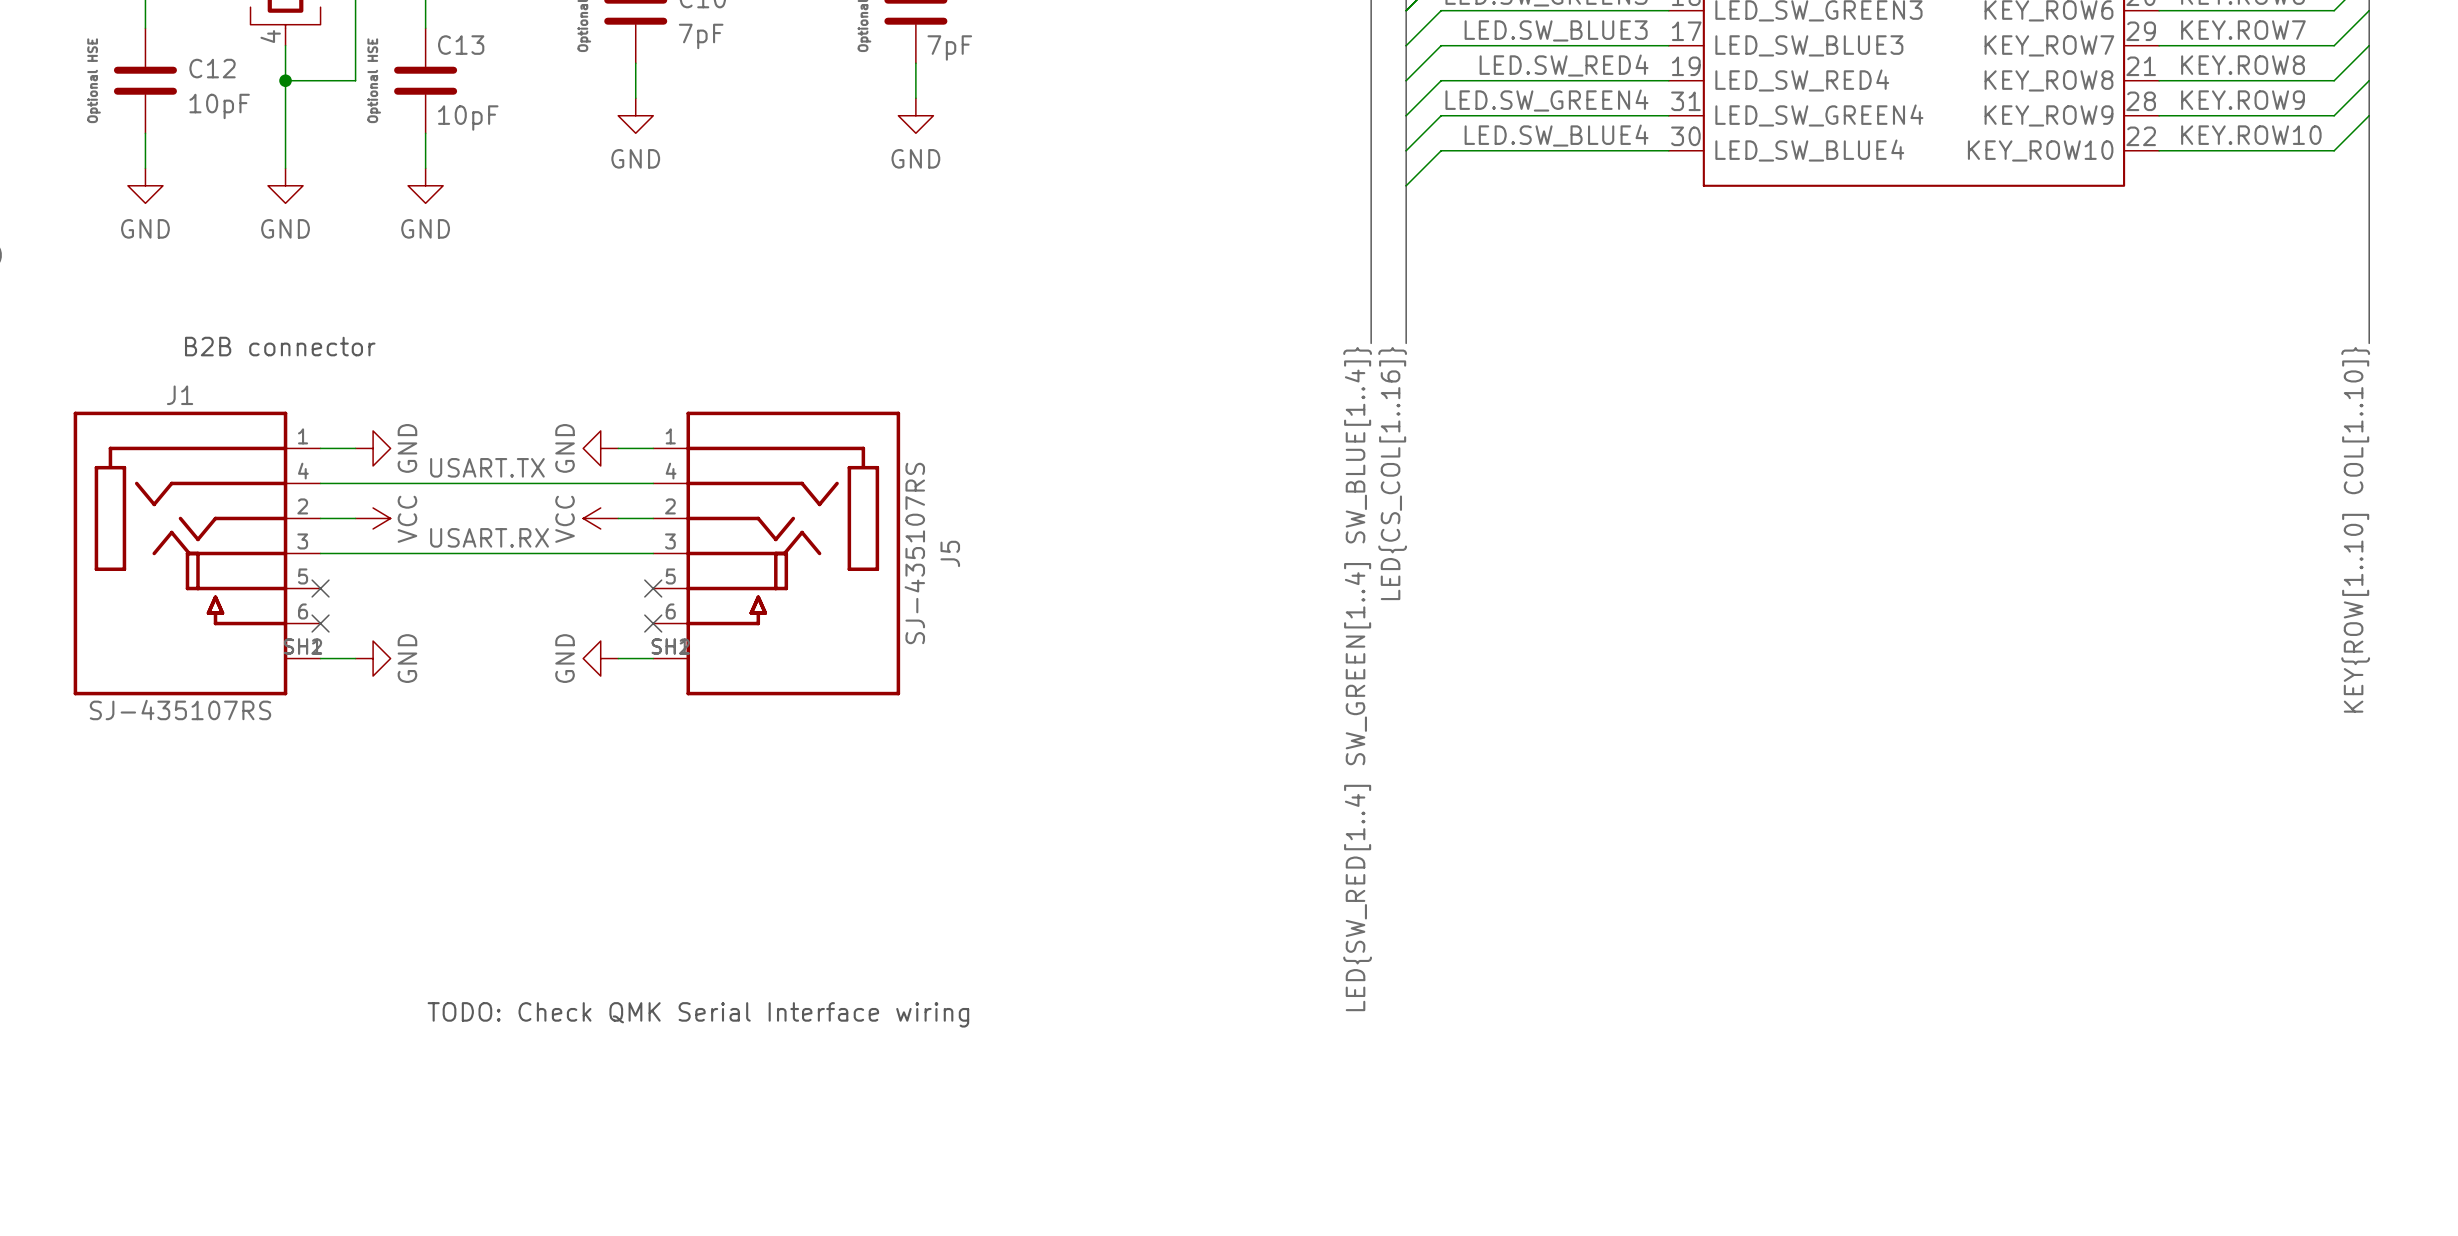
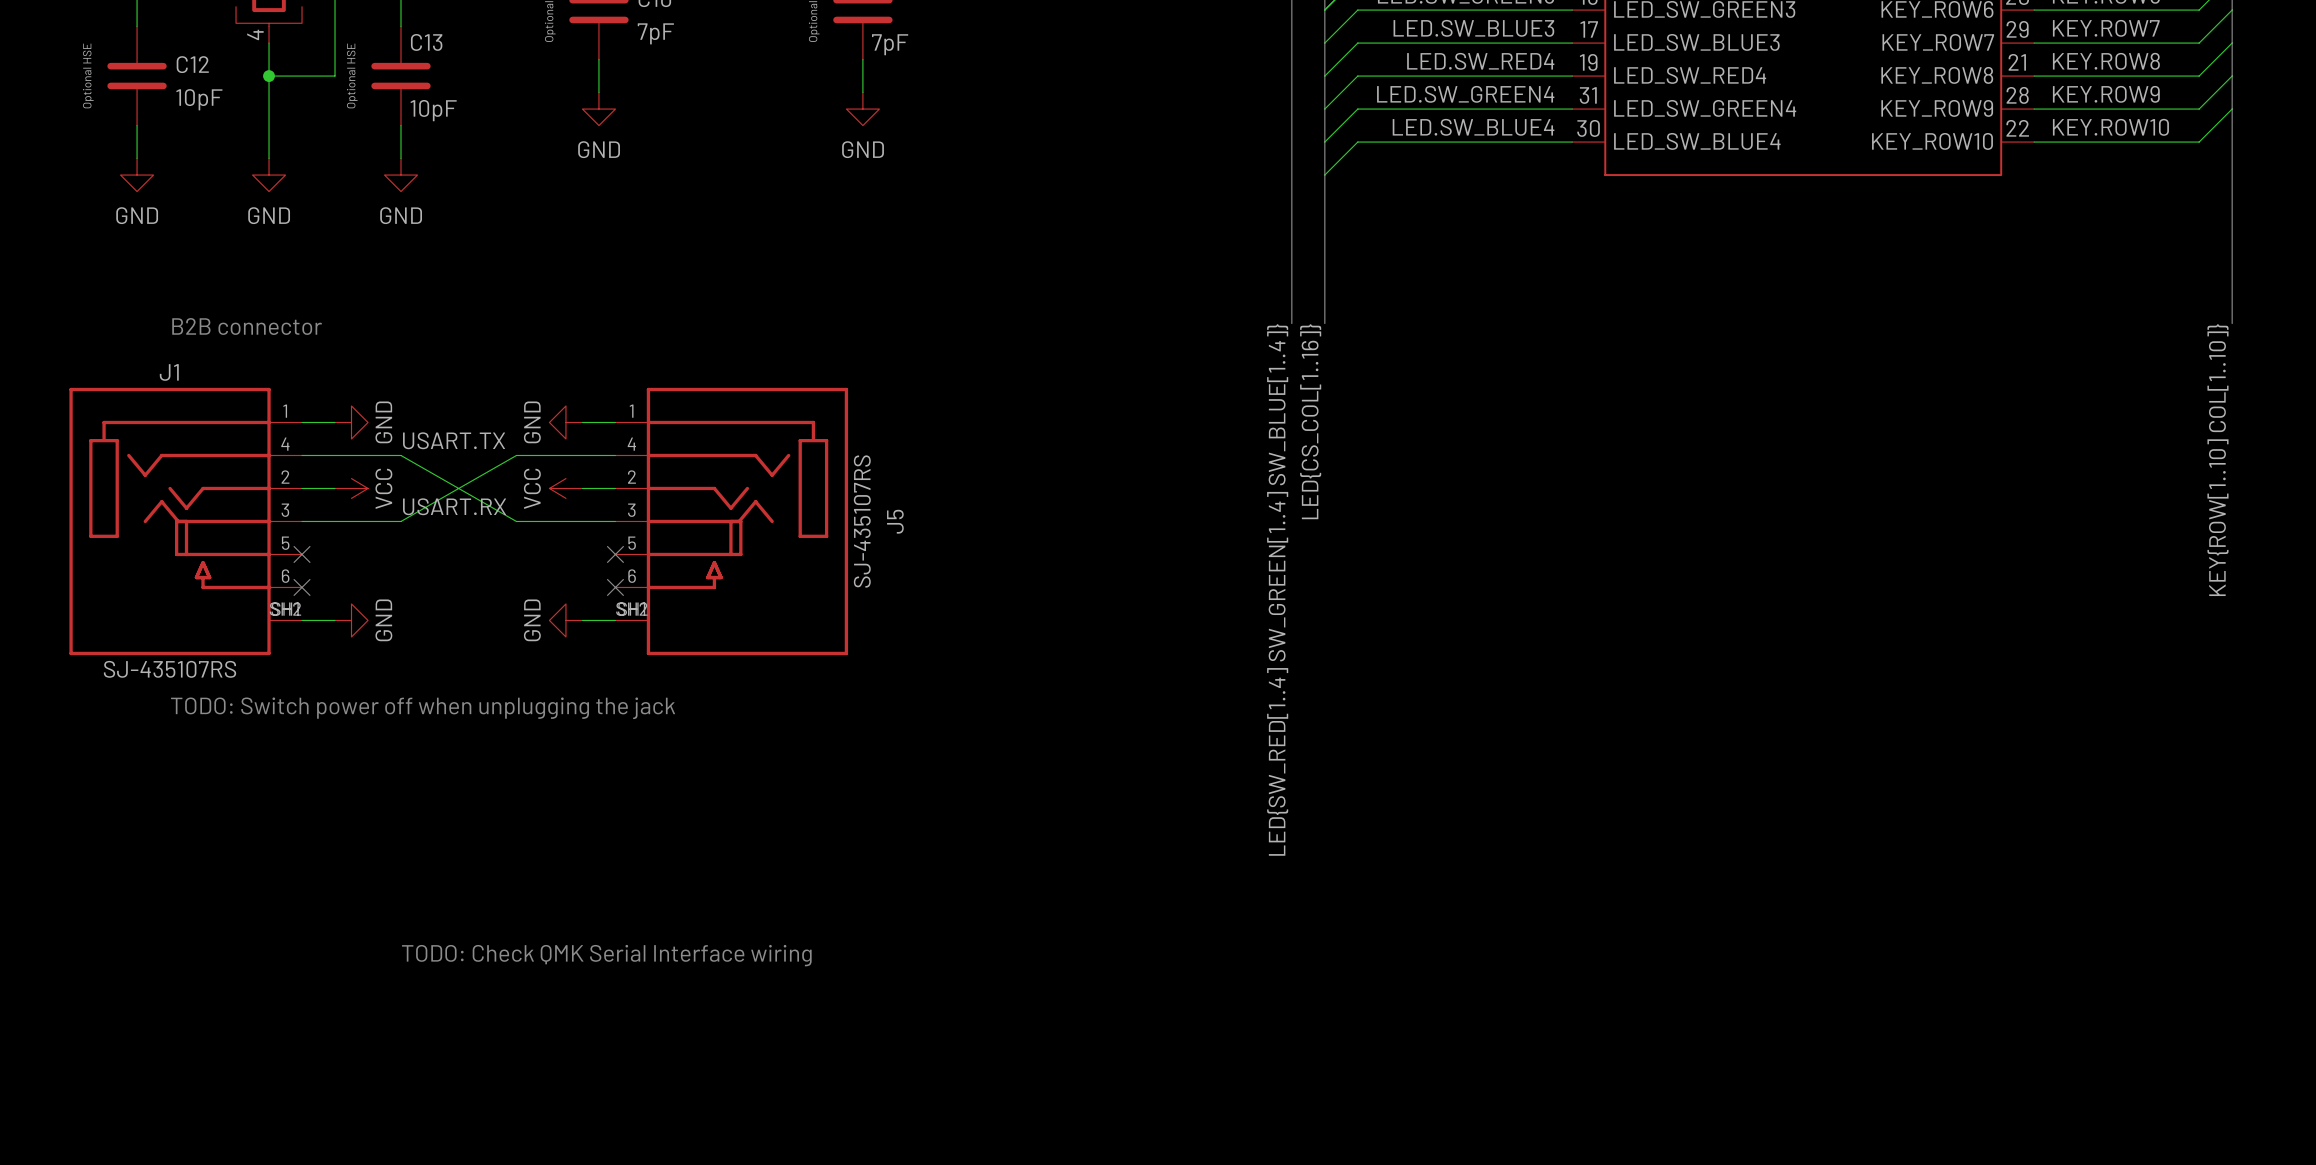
wire: (425, 483) (548, 483) -> (400, 455) (516, 521)
wire: (425, 553) (548, 553) -> (400, 521) (516, 455)
text: none -> TODO: Switch power off when unplugging the jack (423, 708)

